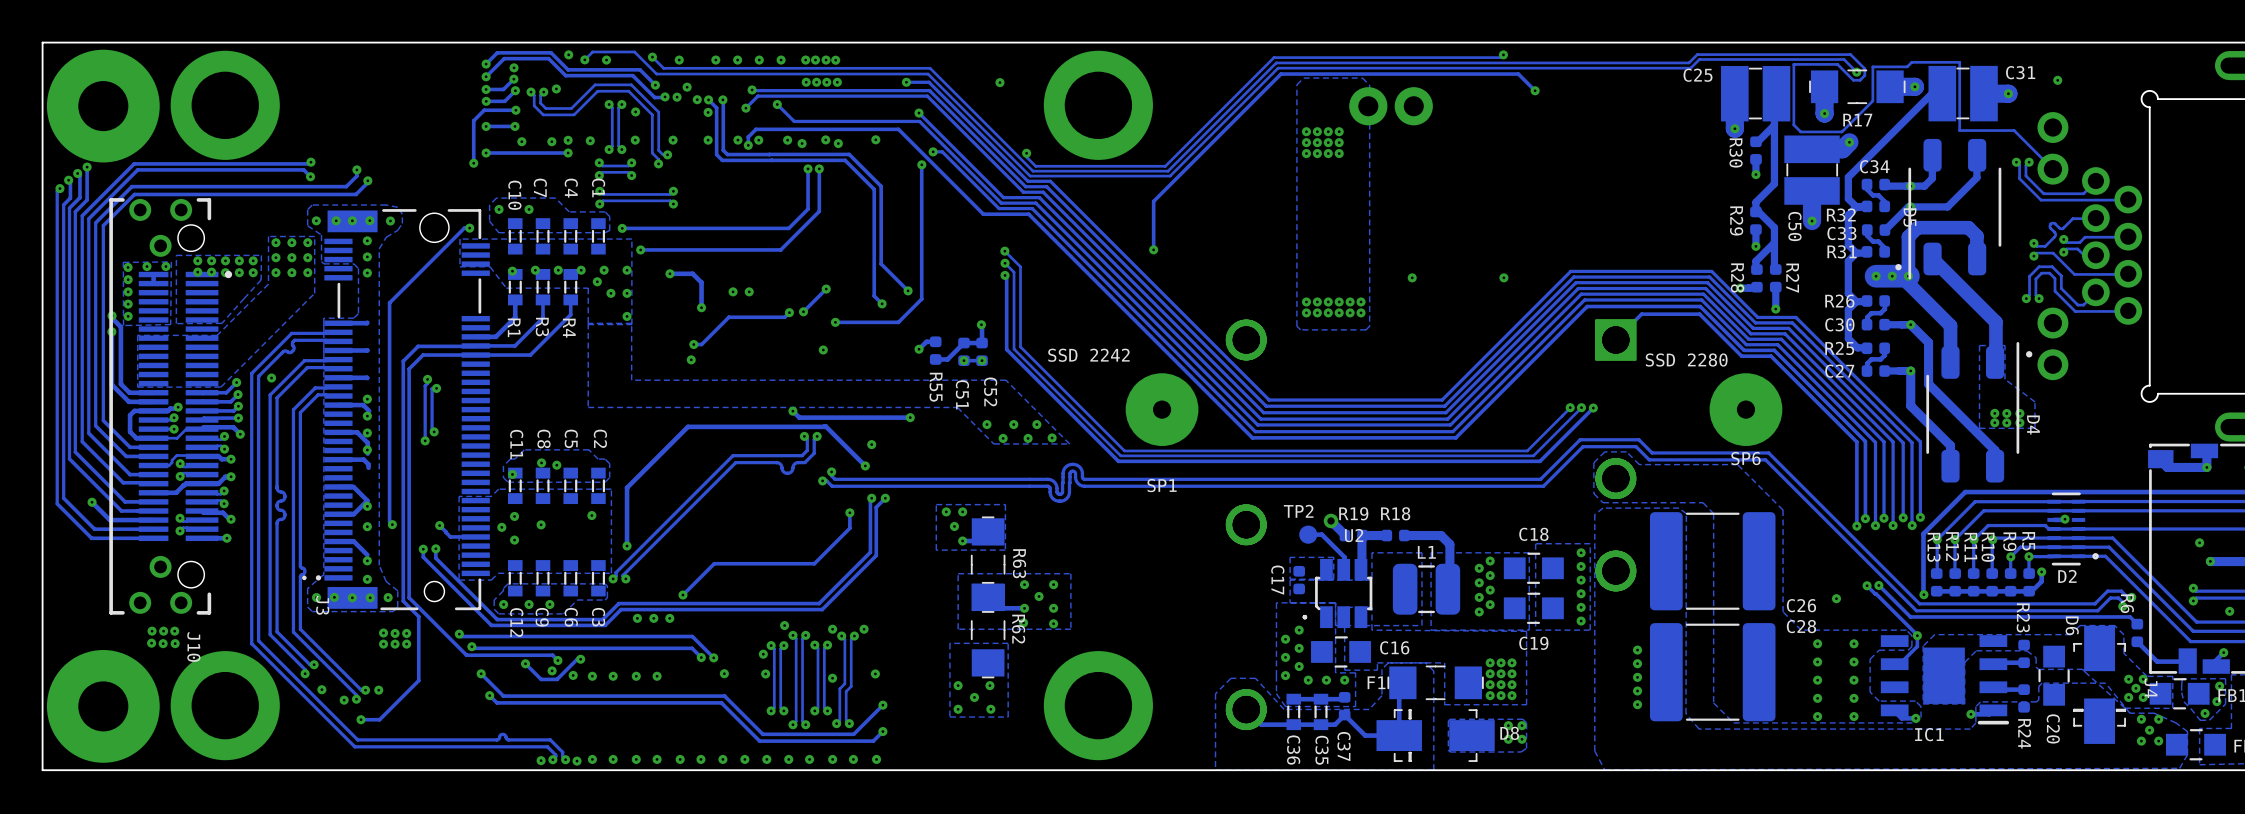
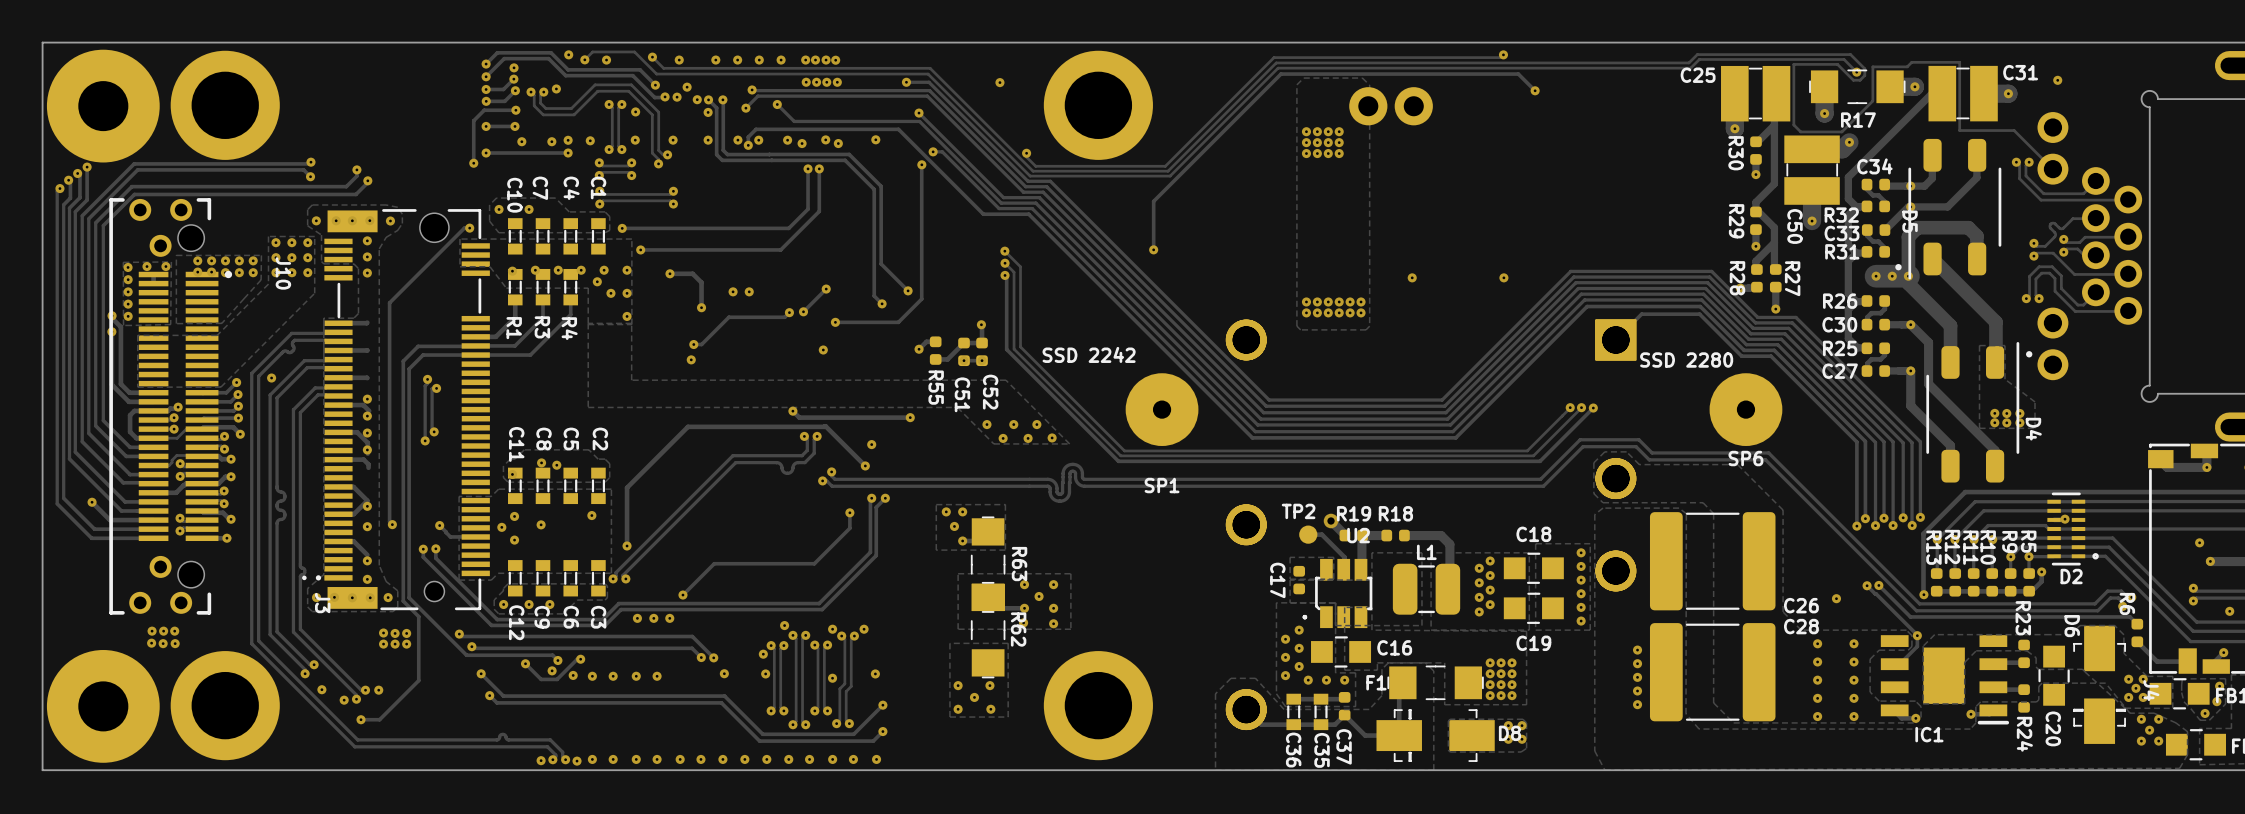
J10 name position: J10 (193, 647) -> J10 (283, 273)

